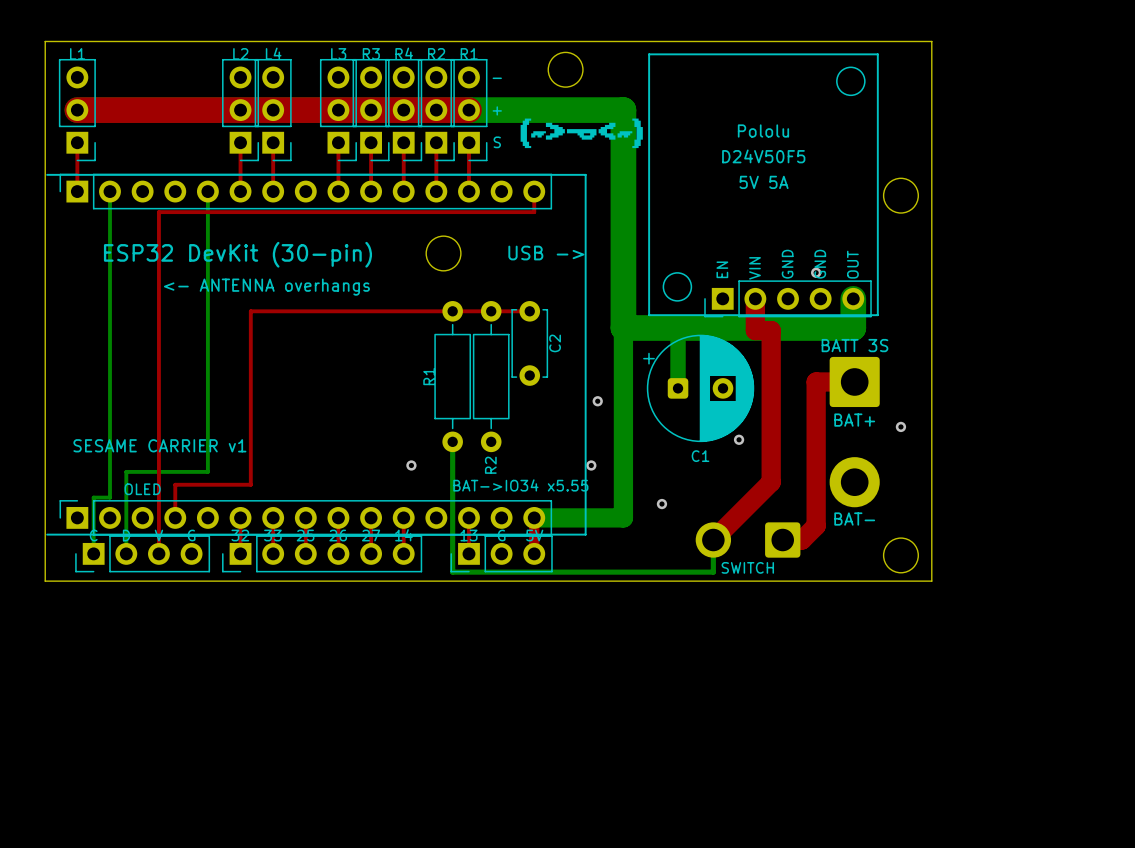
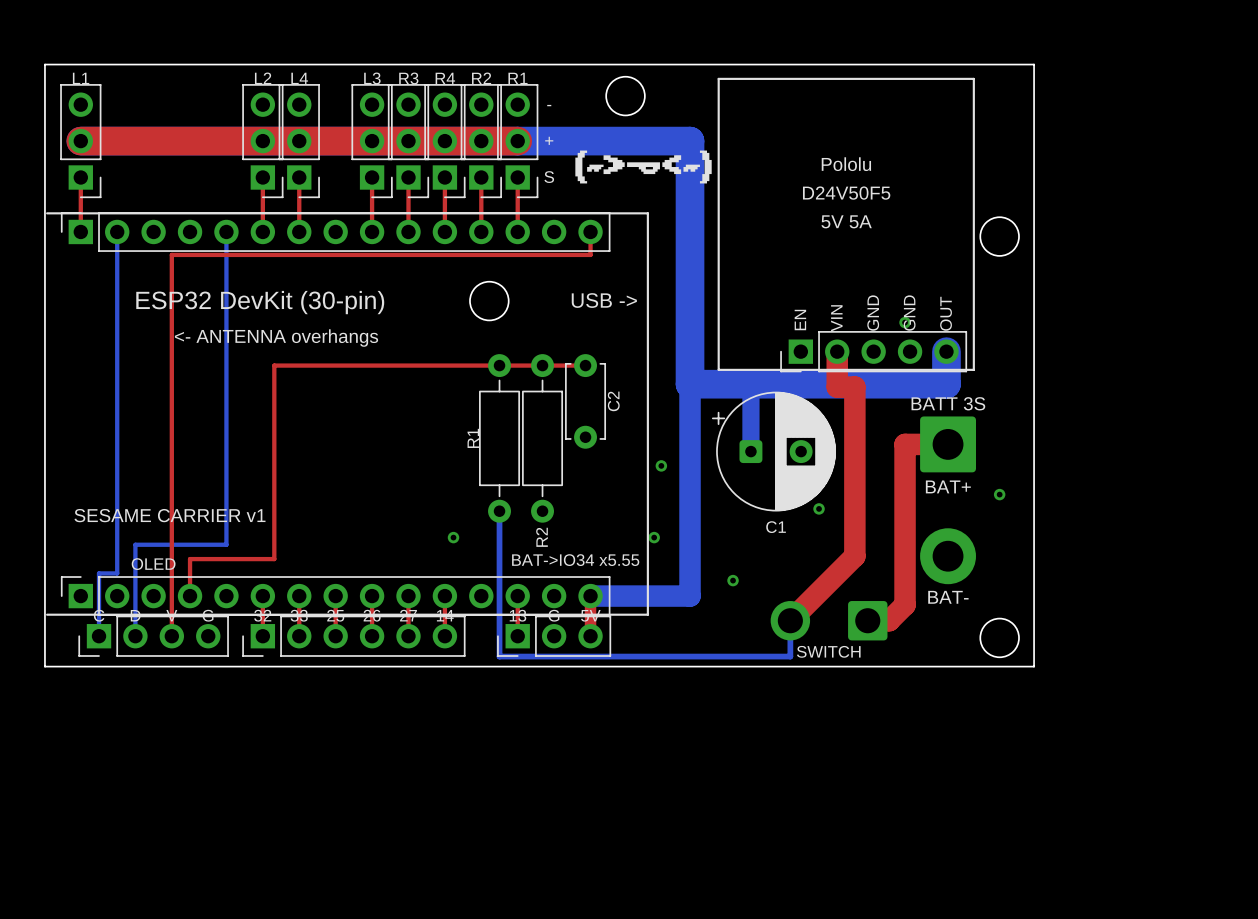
drawing: [836, 66, 866, 97] -> none
drawing: [662, 272, 693, 302] -> none

